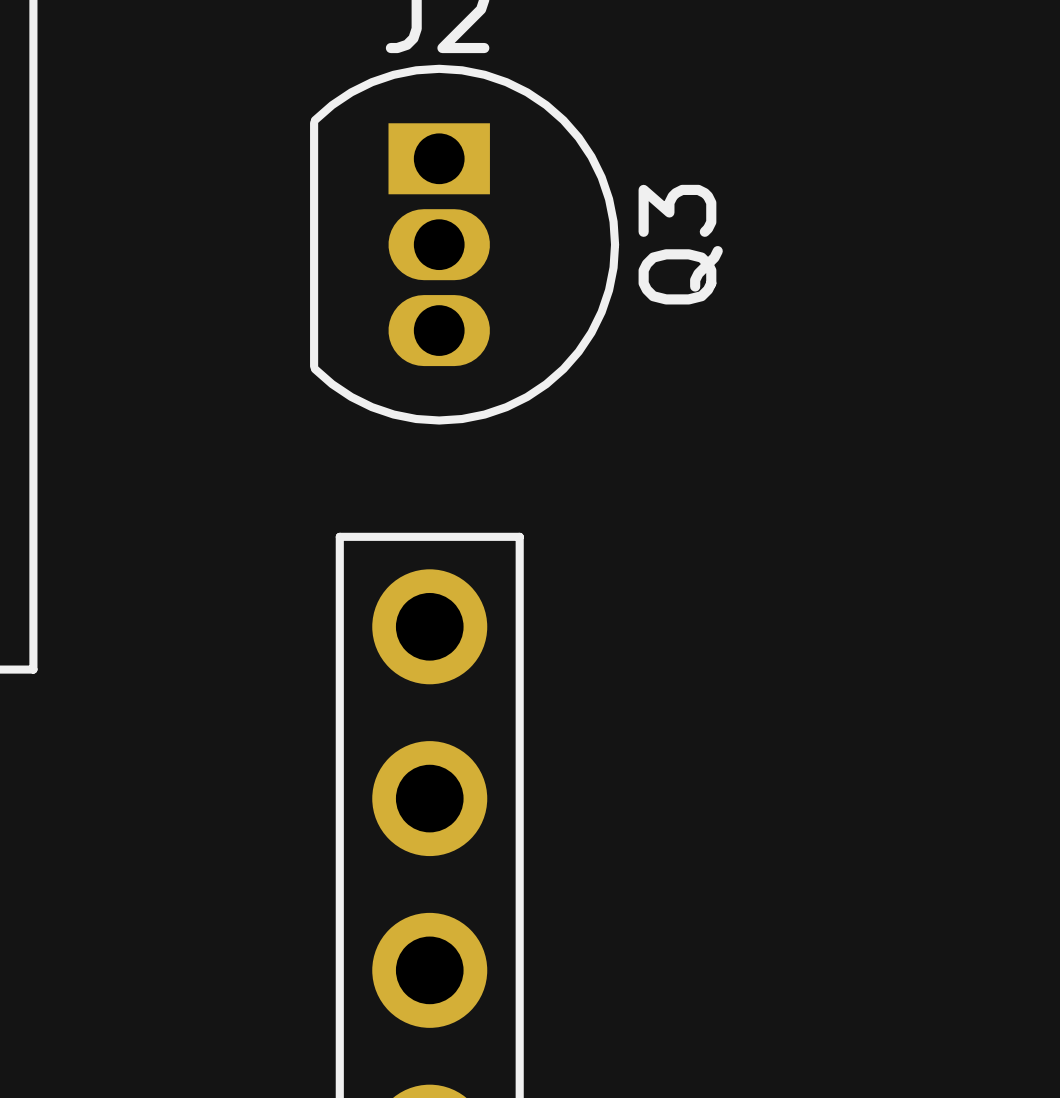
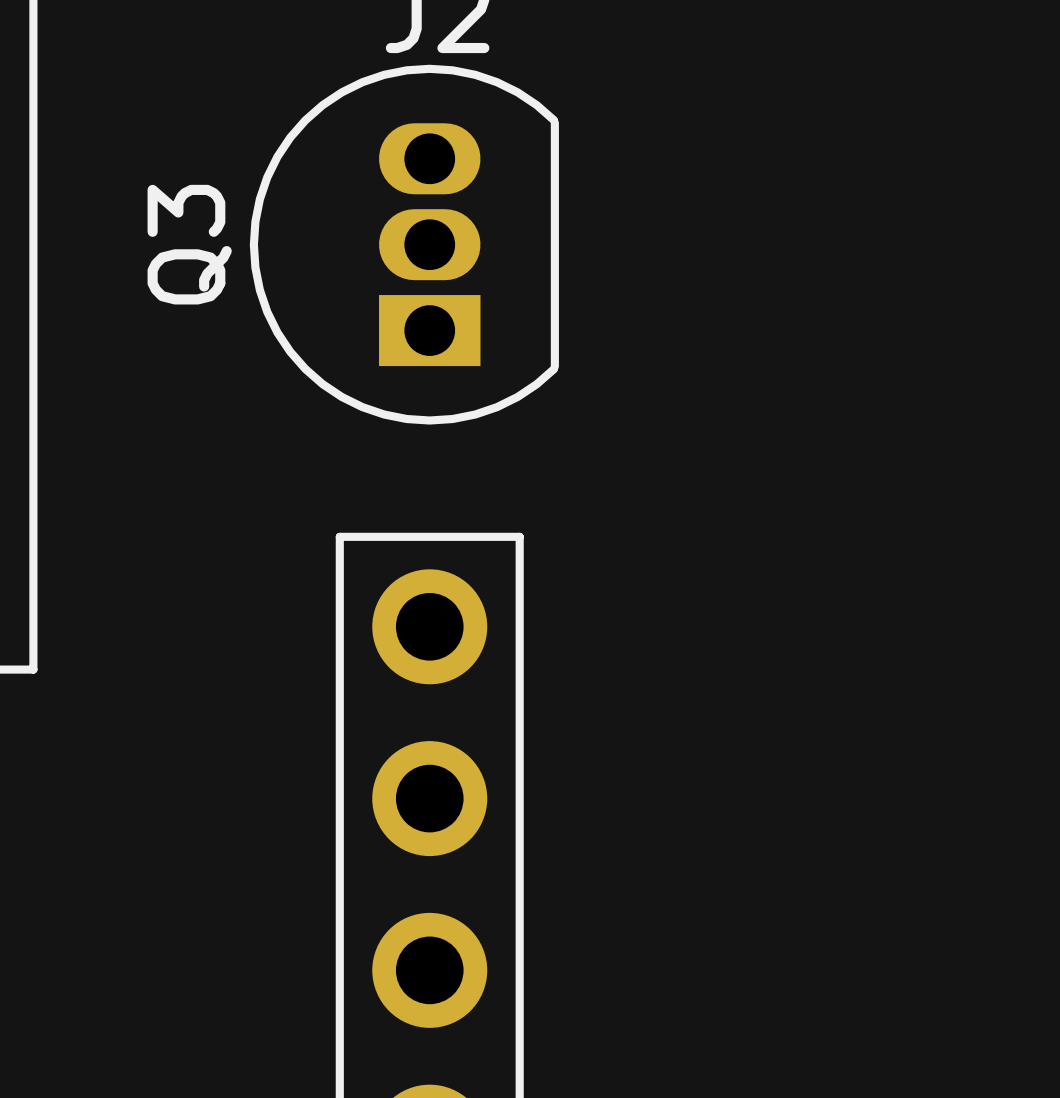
Q3 rotation: 0° (464, 244) -> 180° (404, 244)

